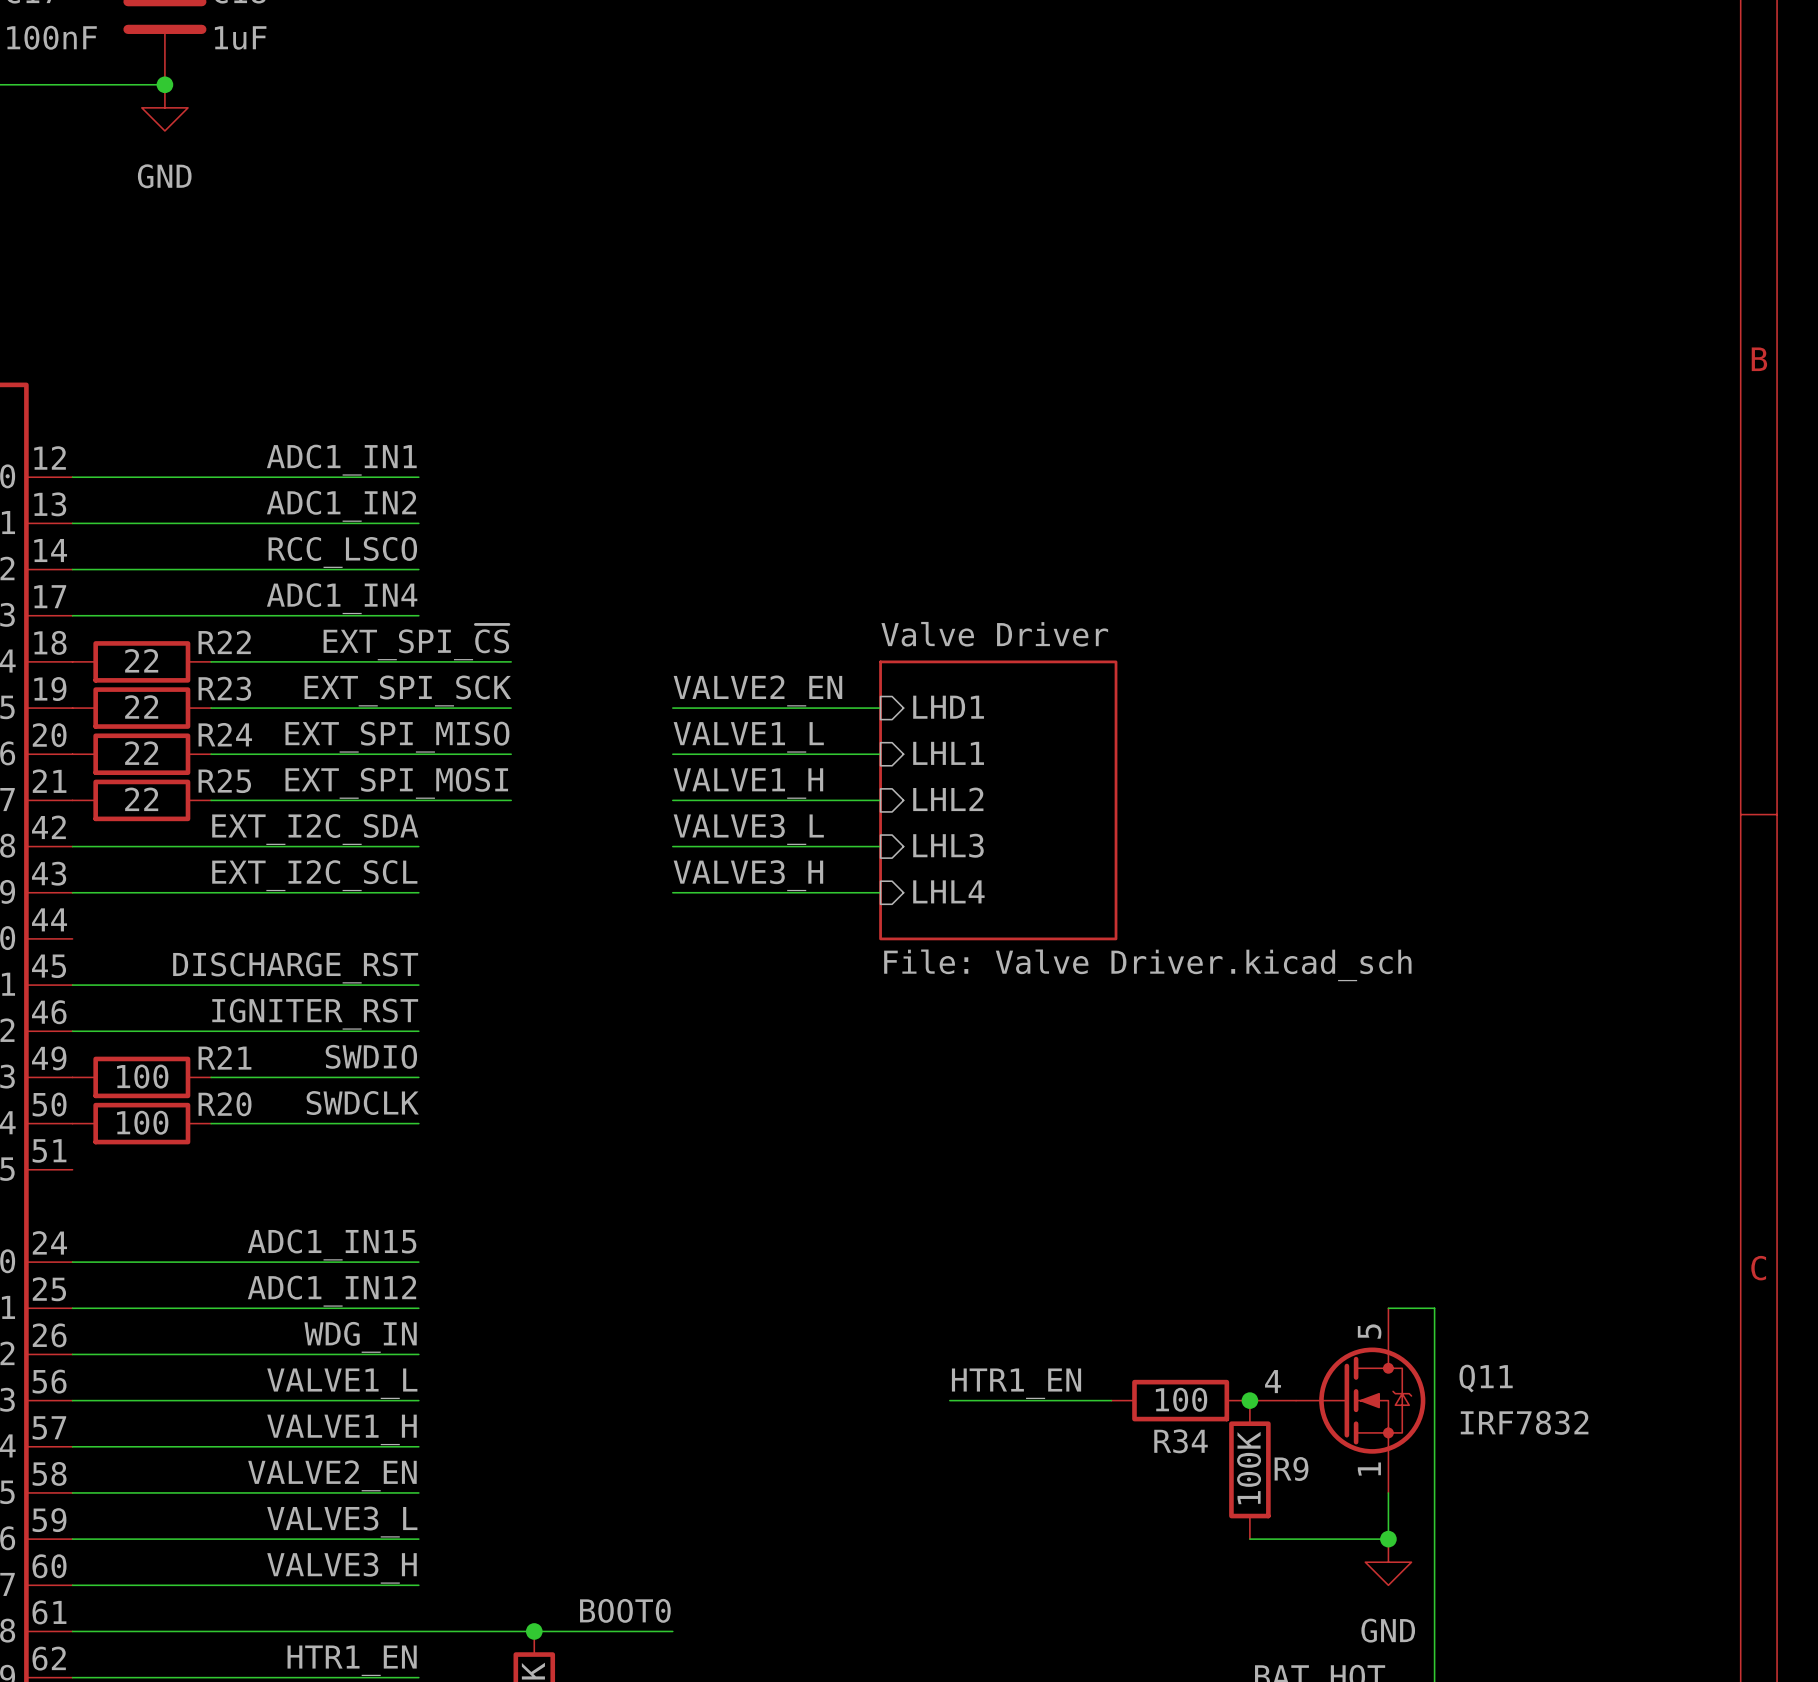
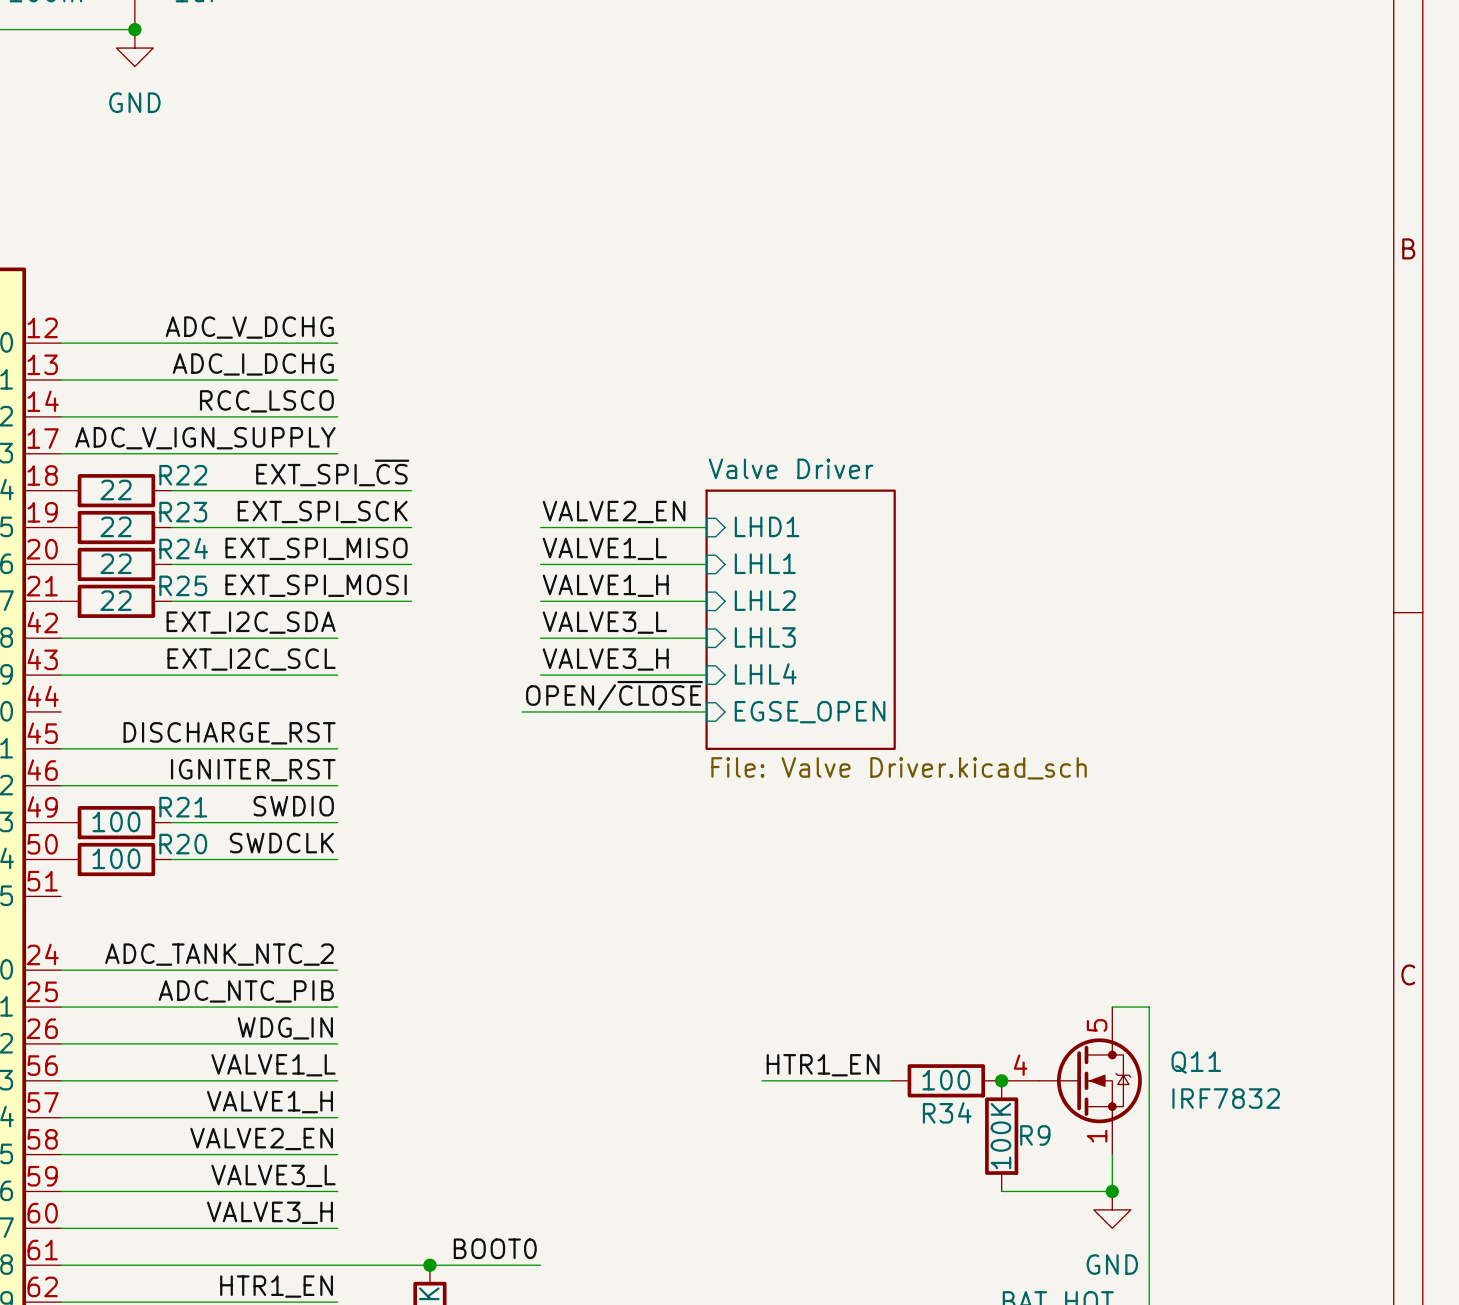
label: ADC1_IN1 (341, 460) -> ADC_V_DCHG (249, 327)
label: ADC1_IN2 (341, 506) -> ADC_I_DCHG (253, 364)
label: ADC1_IN4 (342, 598) -> ADC_V_IGN_SUPPLY (205, 438)
sheet Valve Driver: File: Valve Driver.kicad_sch (998, 800) -> none
sheet Valve Driver: none -> File: Valve Driver.kicad_sch (800, 619)
label: none -> OPEN/~{CLOSE} (614, 695)
wire: none -> (522, 711) (706, 711)
sheet pin: none -> EGSE_OPEN (810, 712)
label: ADC1_IN15 (332, 1245) -> ADC_TANK_NTC_2 (219, 954)
label: ADC1_IN12 (332, 1291) -> ADC_NTC_PIB (246, 991)

